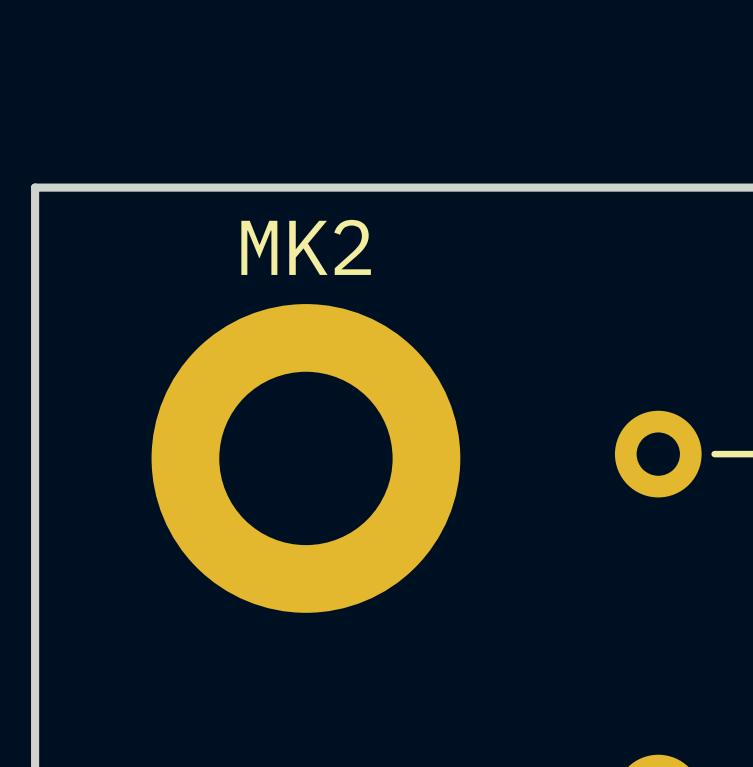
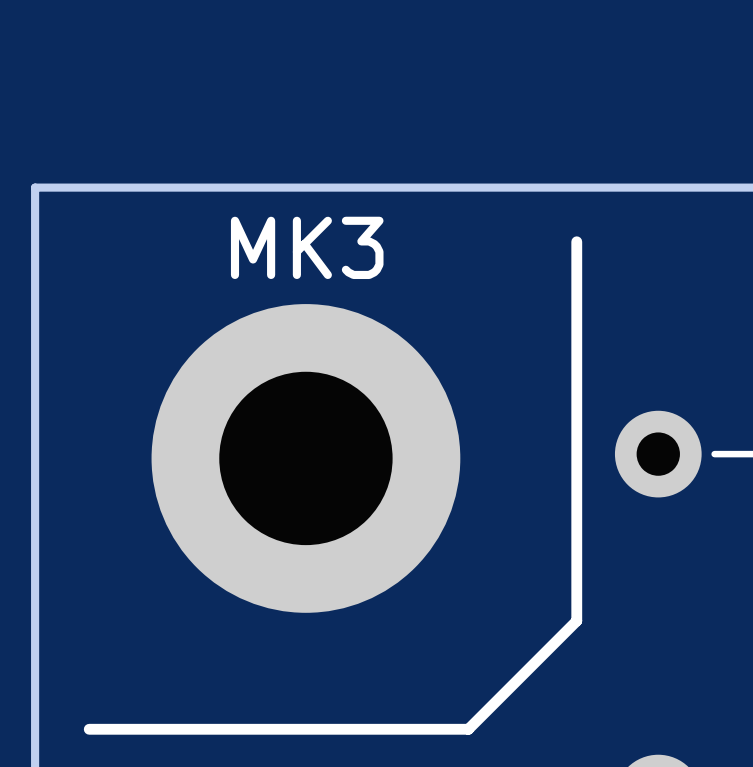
line: none -> (576, 241) (576, 620) (468, 729) (89, 729)
MK2 name: MK2 (306, 247) -> MK3 (307, 247)

